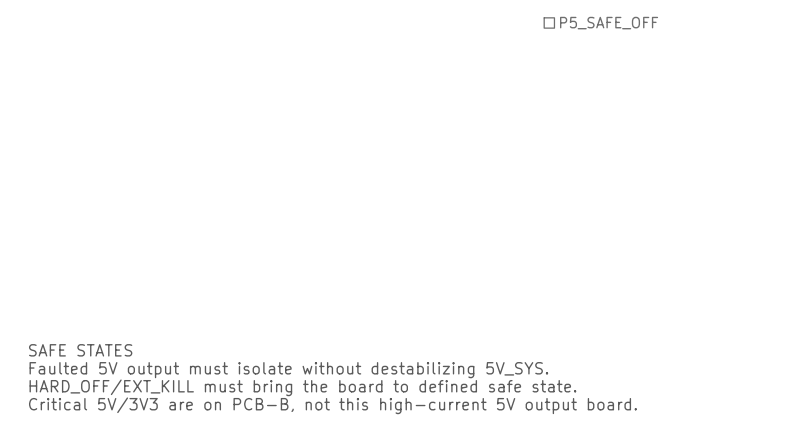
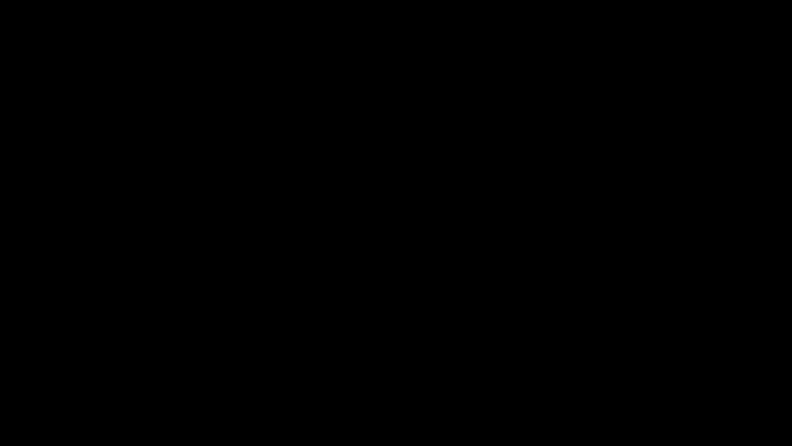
hierarchical label: P5_SAFE_OFF (609, 23) -> none
text: SAFE STATES (80, 350) -> none
text: Faulted 5V output must isolate without destabilizing 5V_SYS. (288, 370) -> none
text: HARD_OFF/EXT_KILL must bring the board to defined safe state. (302, 387) -> none
text: Critical 5V/3V3 are on PCB-B, not this high-current 5V output board. (332, 405) -> none

